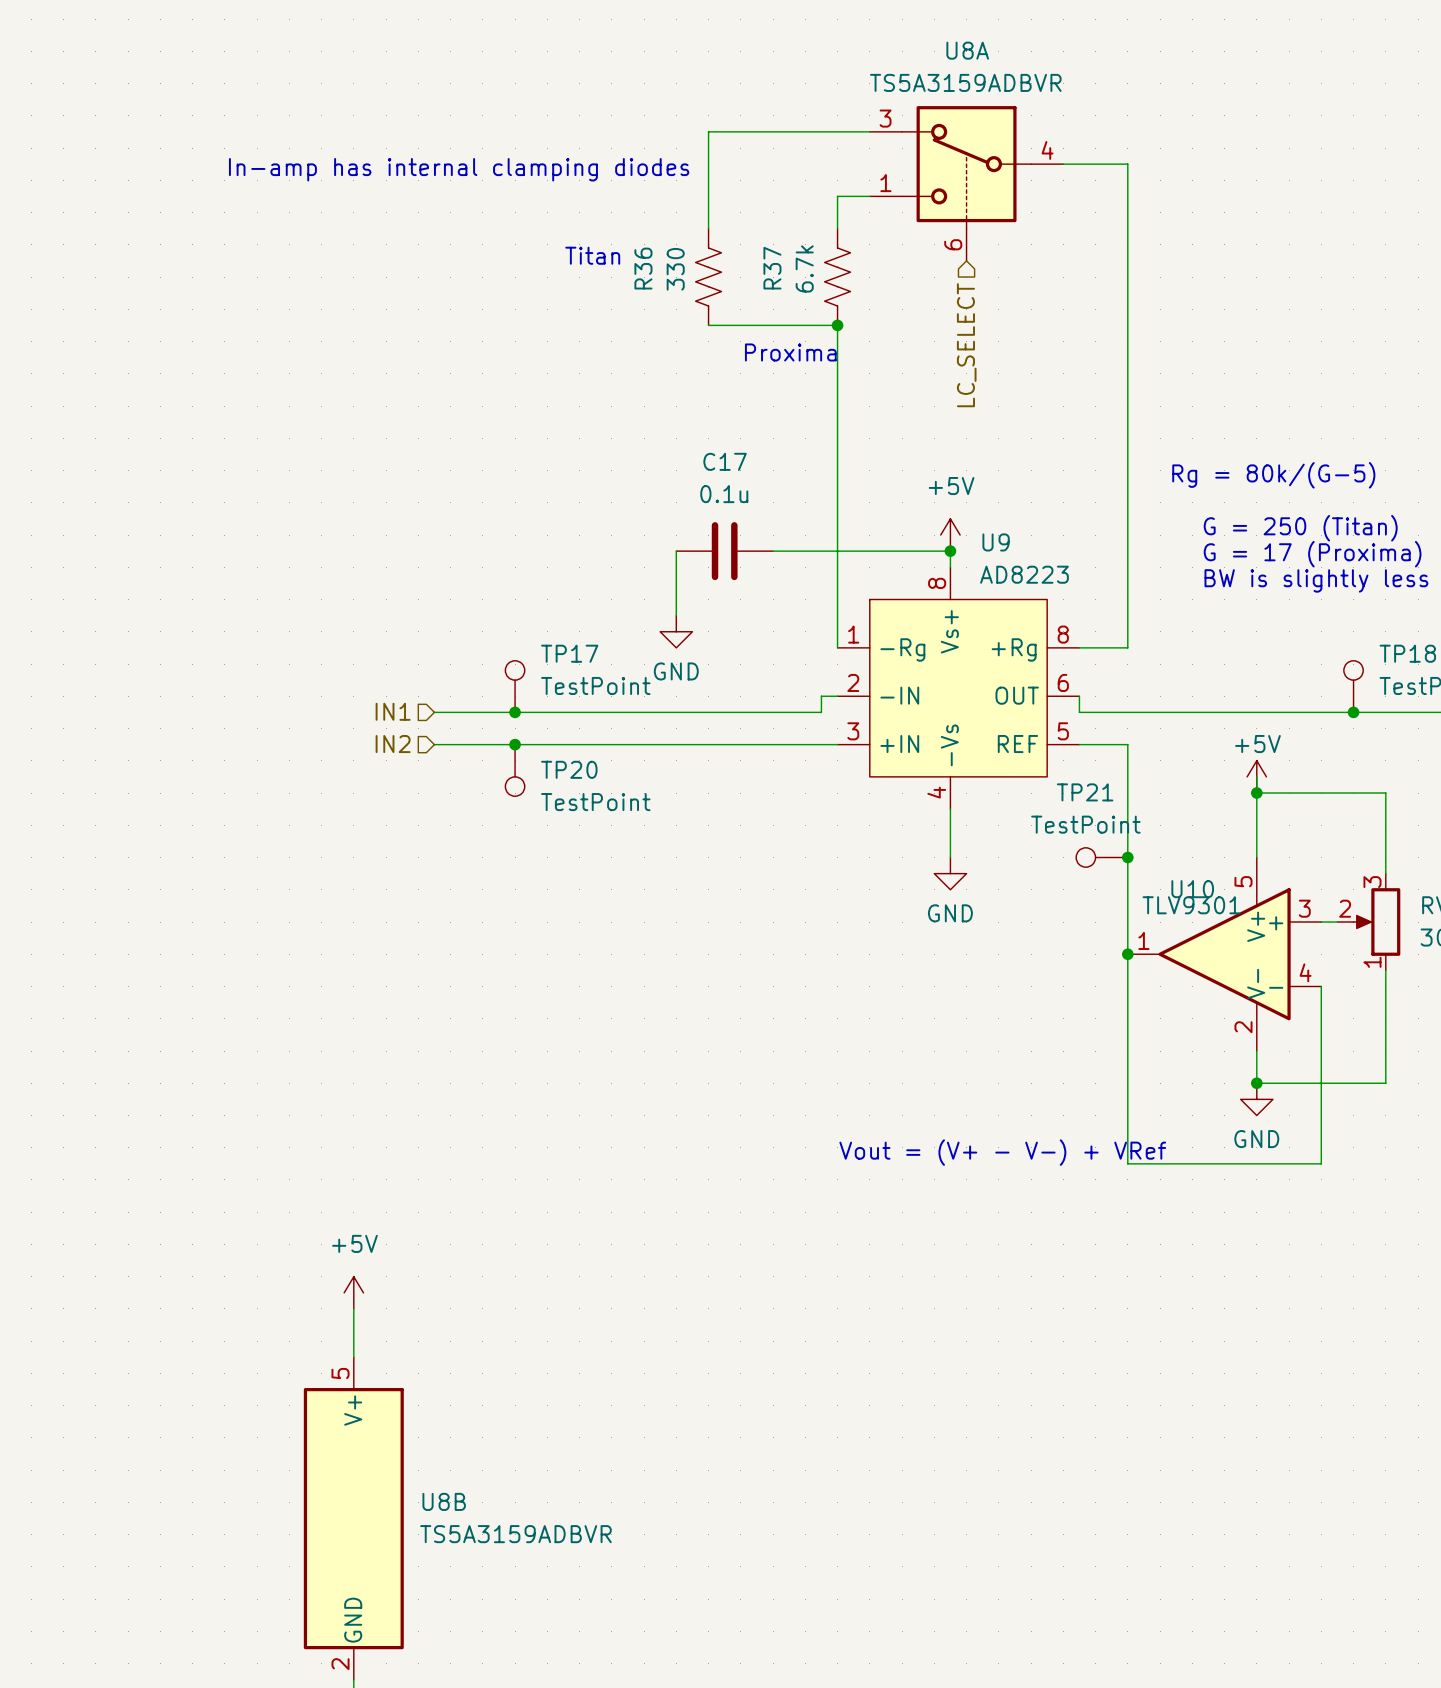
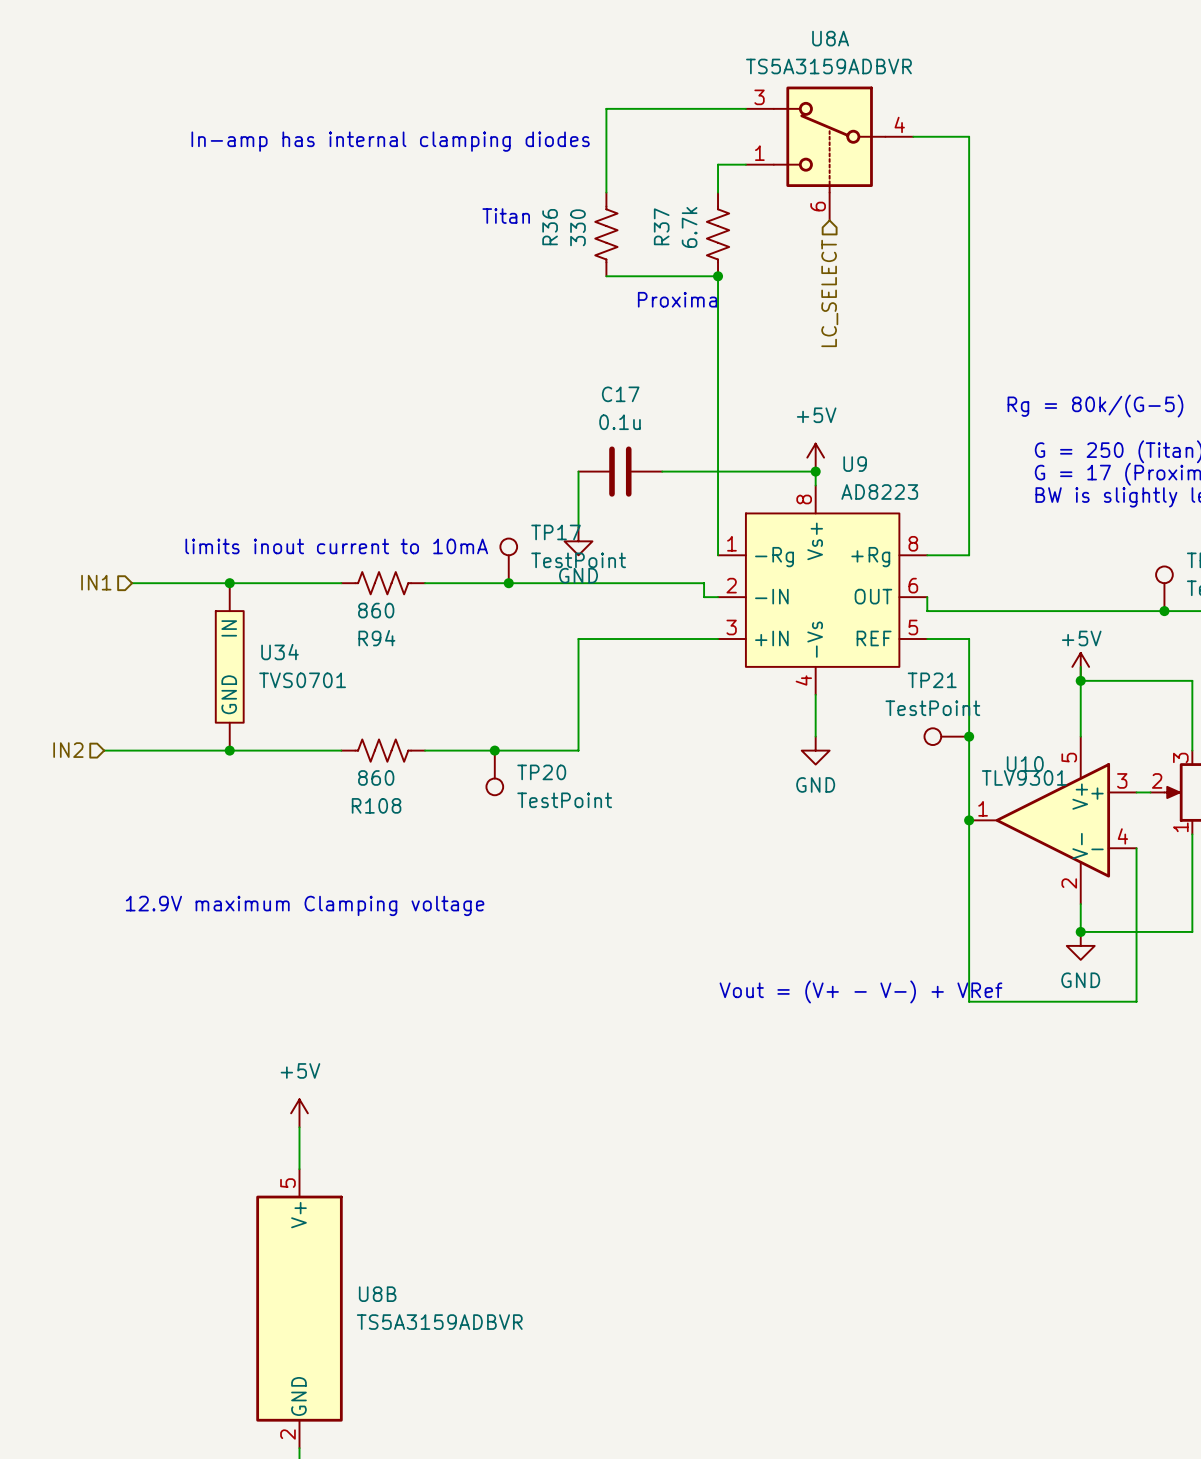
text: none -> limits inout current to 10mA (336, 546)
wire: none -> (132, 583) (341, 583)
junction: none -> (229, 583)
R94: none -> 860 (383, 583)
junction: none -> (508, 583)
TP17 position: (515, 686) -> (508, 560)
wire: (821, 696) (821, 712) (434, 712) -> (704, 597) (704, 583) (425, 583)
hierarchical label position: IN1 (393, 711) -> IN1 (96, 582)
junction: (515, 712) -> none
hierarchical label: IN2 (393, 744) -> none
wire: (434, 744) (676, 744) -> (425, 750) (578, 750) (578, 639)
junction: (515, 744) -> none
TP20 position: (515, 770) -> (494, 772)
U34: none -> TVS0701 (229, 666)
hierarchical label: none -> IN2 (68, 750)
wire: none -> (104, 750) (341, 750)
junction: none -> (229, 750)
R108: none -> 860 (383, 750)
junction: none -> (494, 750)
text: none -> 12.9V maximum Clamping voltage (305, 905)

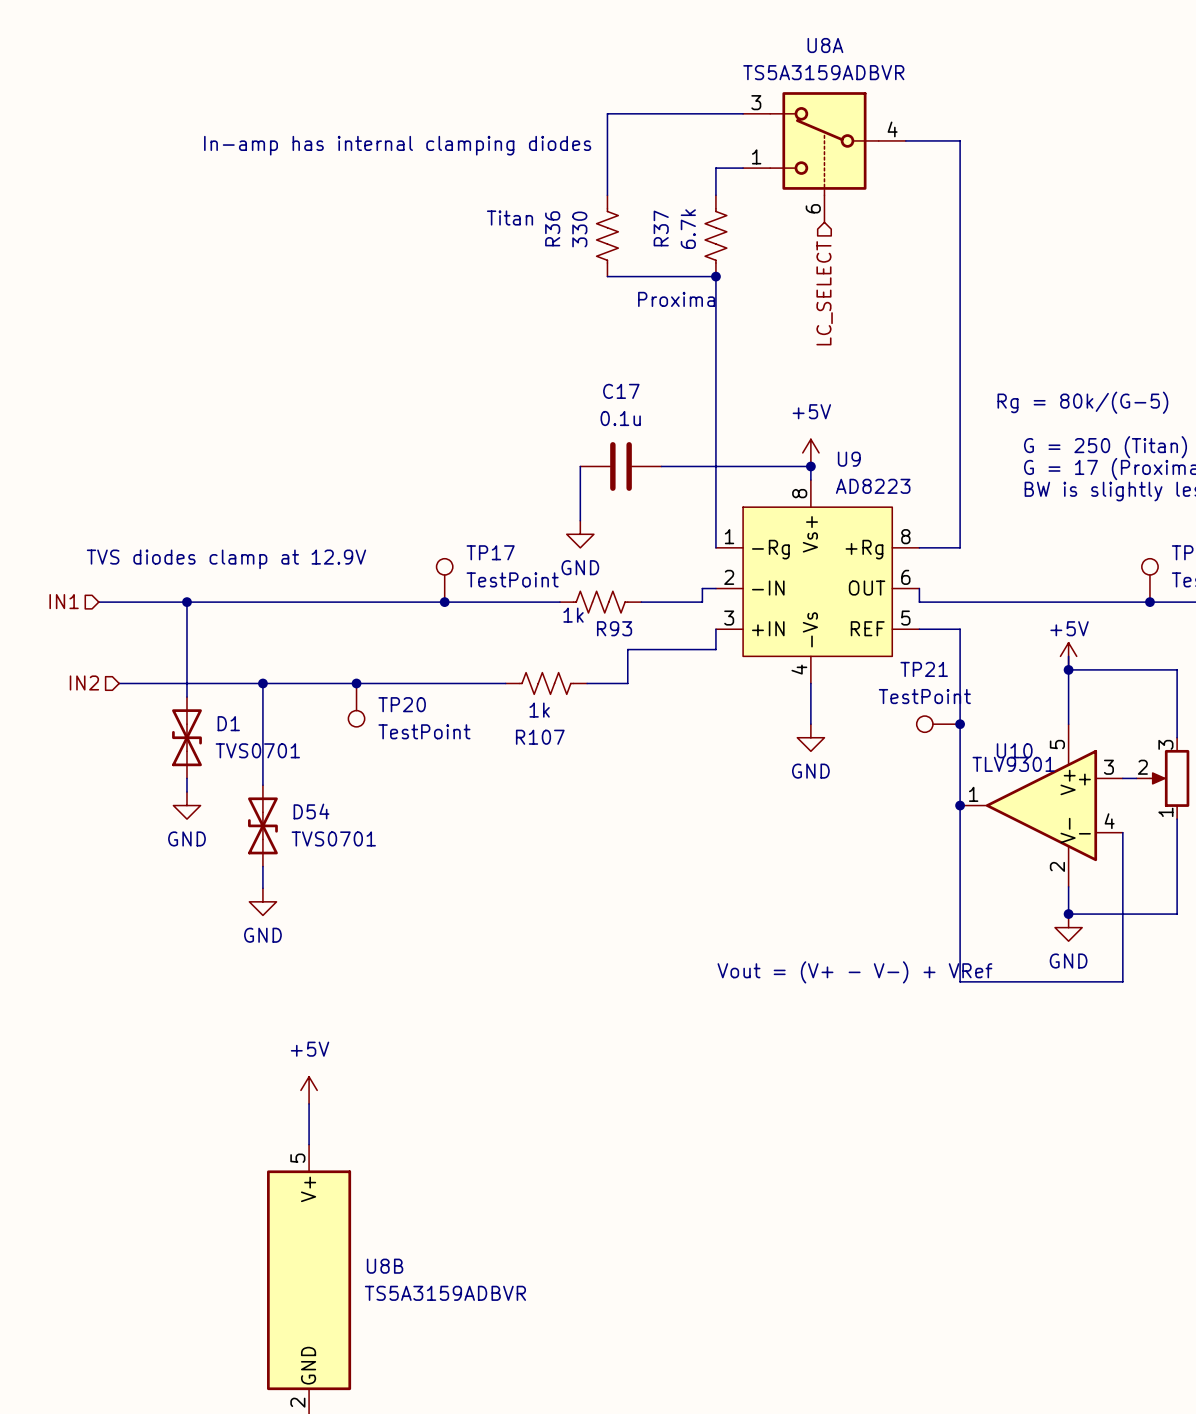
text: limits inout current to 10mA (336, 546) -> none
TP17 position: (508, 560) -> (444, 580)
text: none -> TVS diodes clamp at 12.9V (226, 559)
hierarchical label position: IN1 (96, 582) -> IN1 (64, 601)
wire: (132, 583) (341, 583) -> none
junction: (229, 583) -> none
R94: 860 (383, 583) -> none
wire: (425, 583) (704, 583) (704, 597) -> (641, 602) (702, 602) (702, 588)
junction: (508, 583) -> none
wire: none -> (98, 602) (559, 602)
wire: none -> (186, 602) (186, 697)
junction: none -> (186, 602)
junction: none -> (444, 602)
R93: none -> 1k (600, 602)
wire: (718, 639) (578, 639) (578, 750) (425, 750) -> (715, 629) (715, 649) (627, 649) (627, 683) (587, 683)
U34: TVS0701 (229, 666) -> none
wire: none -> (119, 683) (505, 683)
wire: none -> (262, 683) (262, 785)
junction: none -> (262, 683)
junction: none -> (356, 683)
R107: none -> 1k (546, 683)
hierarchical label position: IN2 (68, 750) -> IN2 (84, 682)
wire: (104, 750) (341, 750) -> none
D1: none -> TVS0701 (186, 737)
junction: (229, 750) -> none
R108: 860 (383, 750) -> none
junction: (494, 750) -> none
TP20 position: (494, 772) -> (356, 705)
wire: none -> (186, 778) (186, 791)
power symbol: none -> GND (186, 805)
D54: none -> TVS0701 (262, 825)
wire: none -> (262, 866) (262, 888)
text: 12.9V maximum Clamping voltage (305, 905) -> none
power symbol: none -> GND (262, 901)

